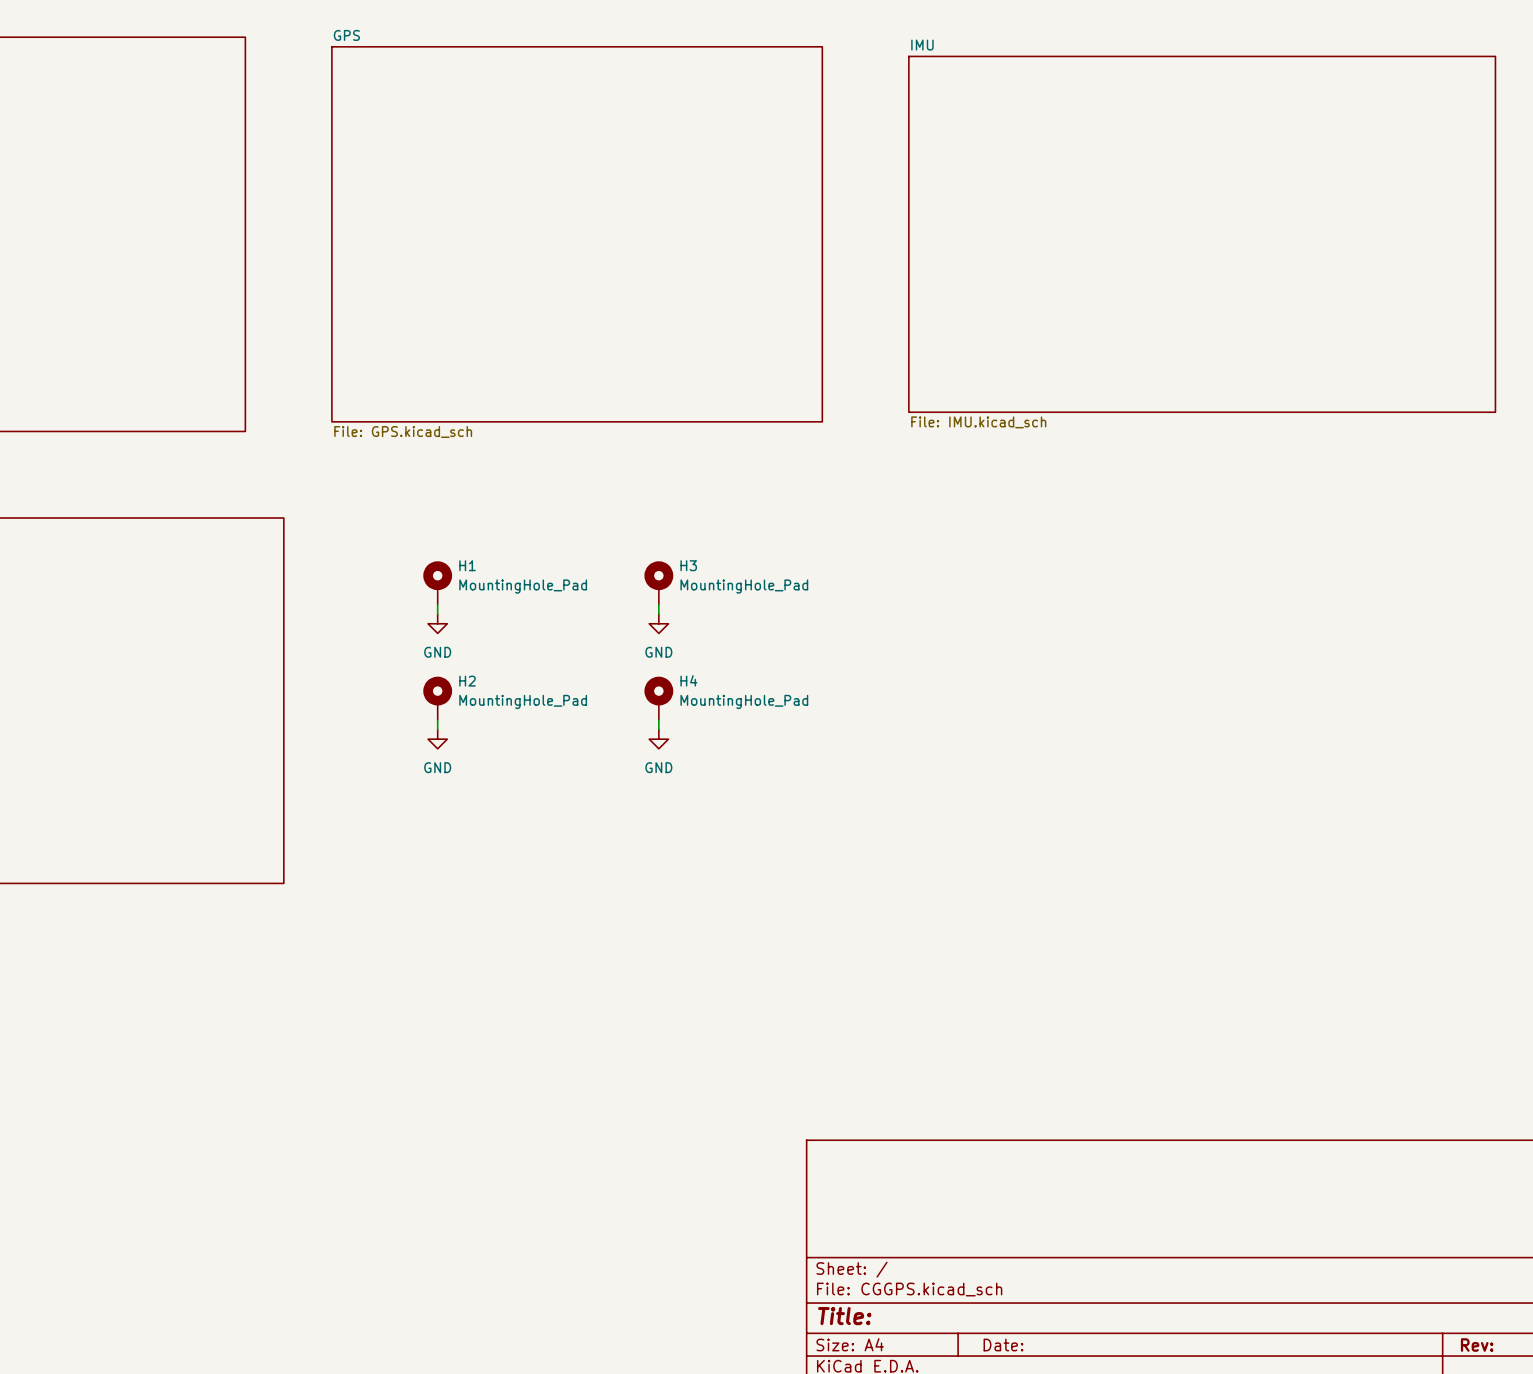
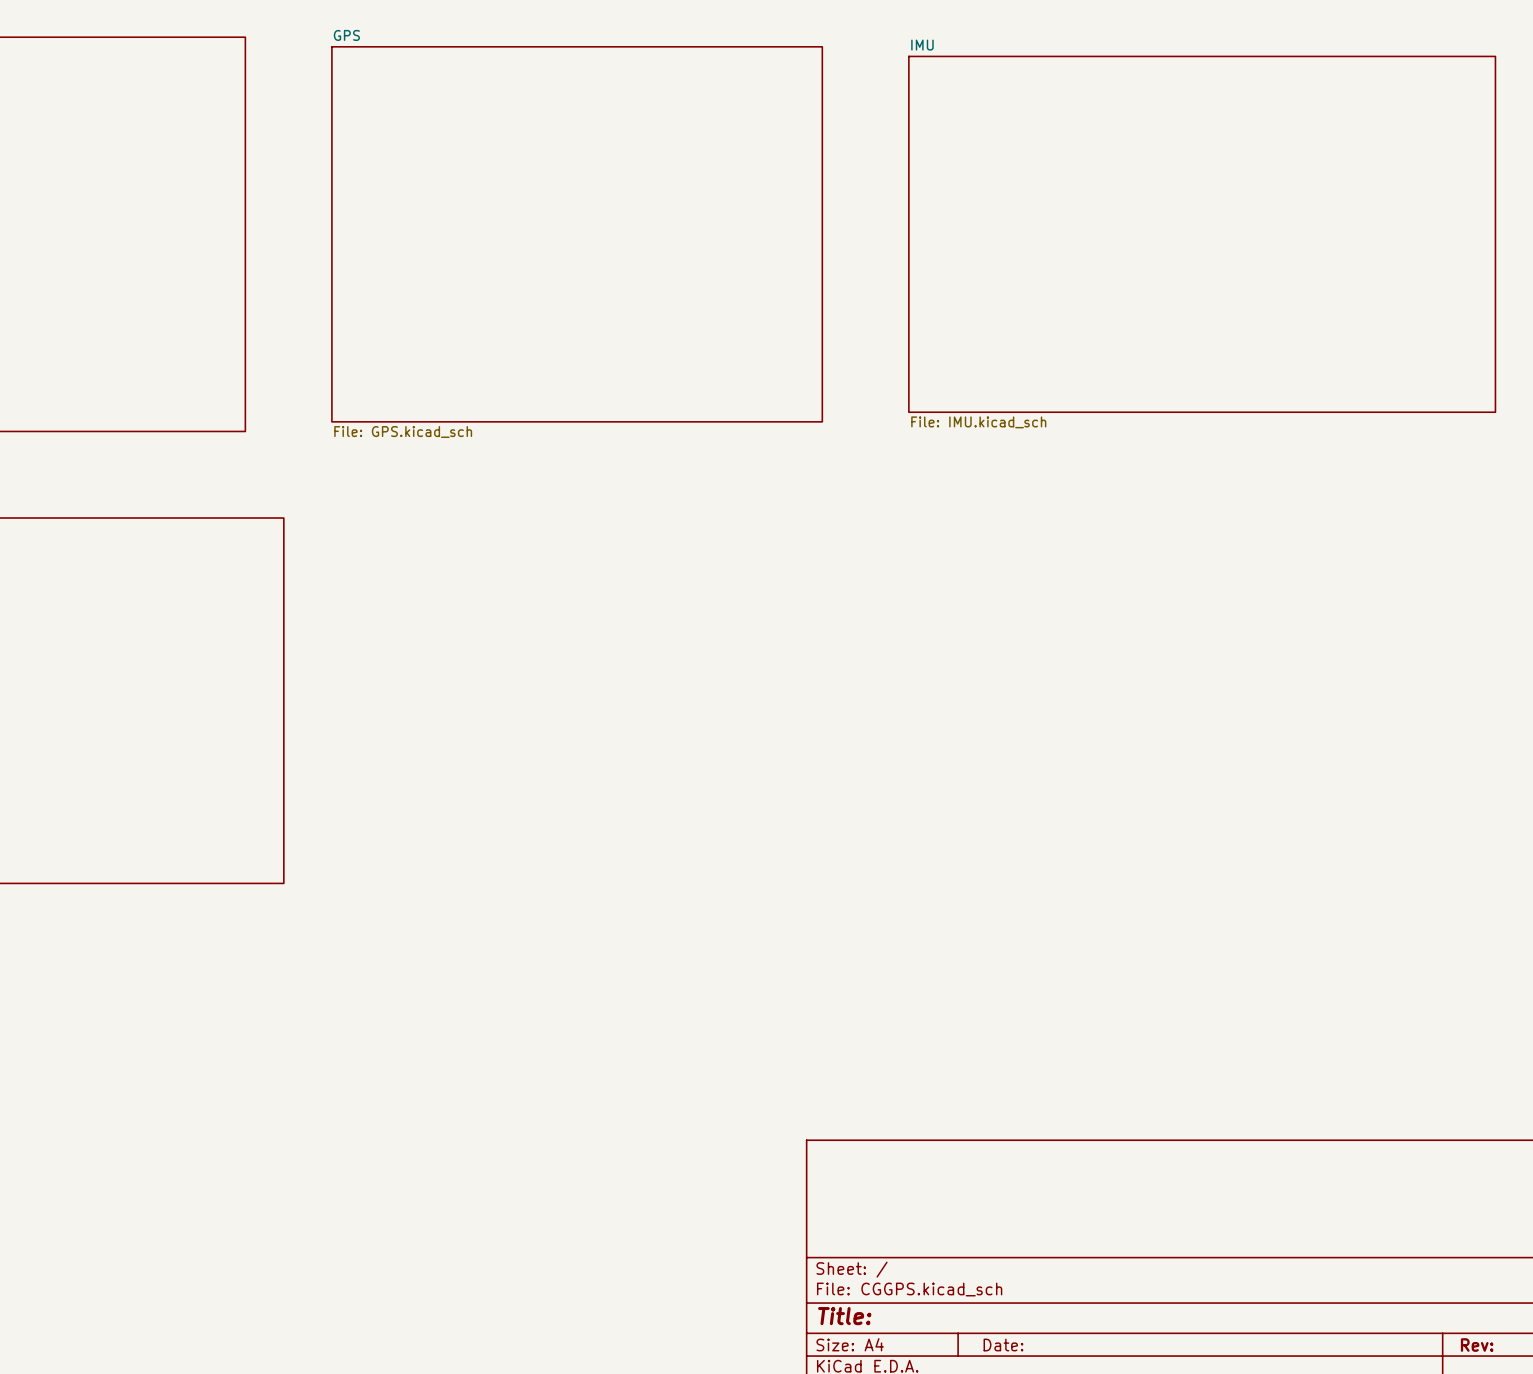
H1: MountingHole_Pad (437, 582) -> none
H3: MountingHole_Pad (658, 582) -> none
wire: (437, 604) (437, 614) -> none
wire: (658, 604) (658, 614) -> none
power symbol: GND (437, 623) -> none
power symbol: GND (658, 623) -> none
H2: MountingHole_Pad (437, 698) -> none
H4: MountingHole_Pad (658, 698) -> none
wire: (437, 719) (437, 729) -> none
wire: (658, 719) (658, 729) -> none
power symbol: GND (437, 739) -> none
power symbol: GND (658, 739) -> none

